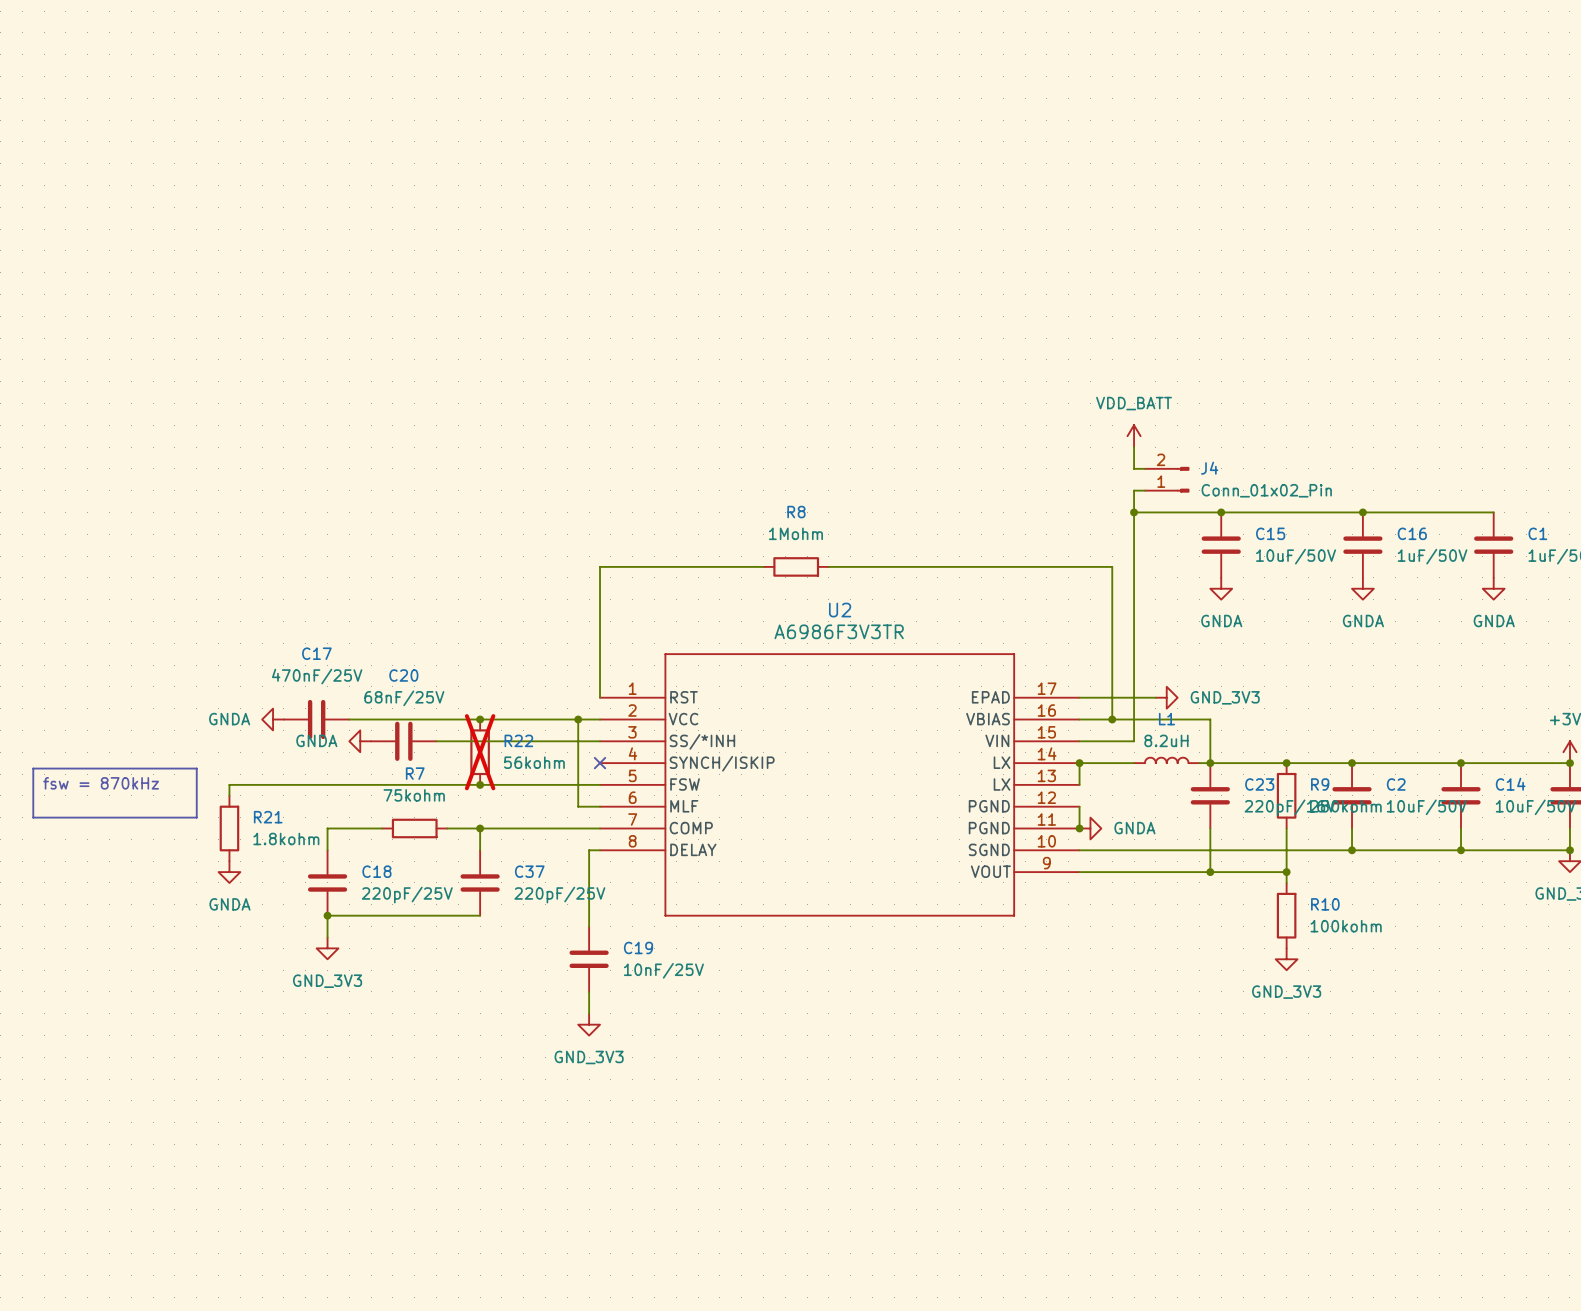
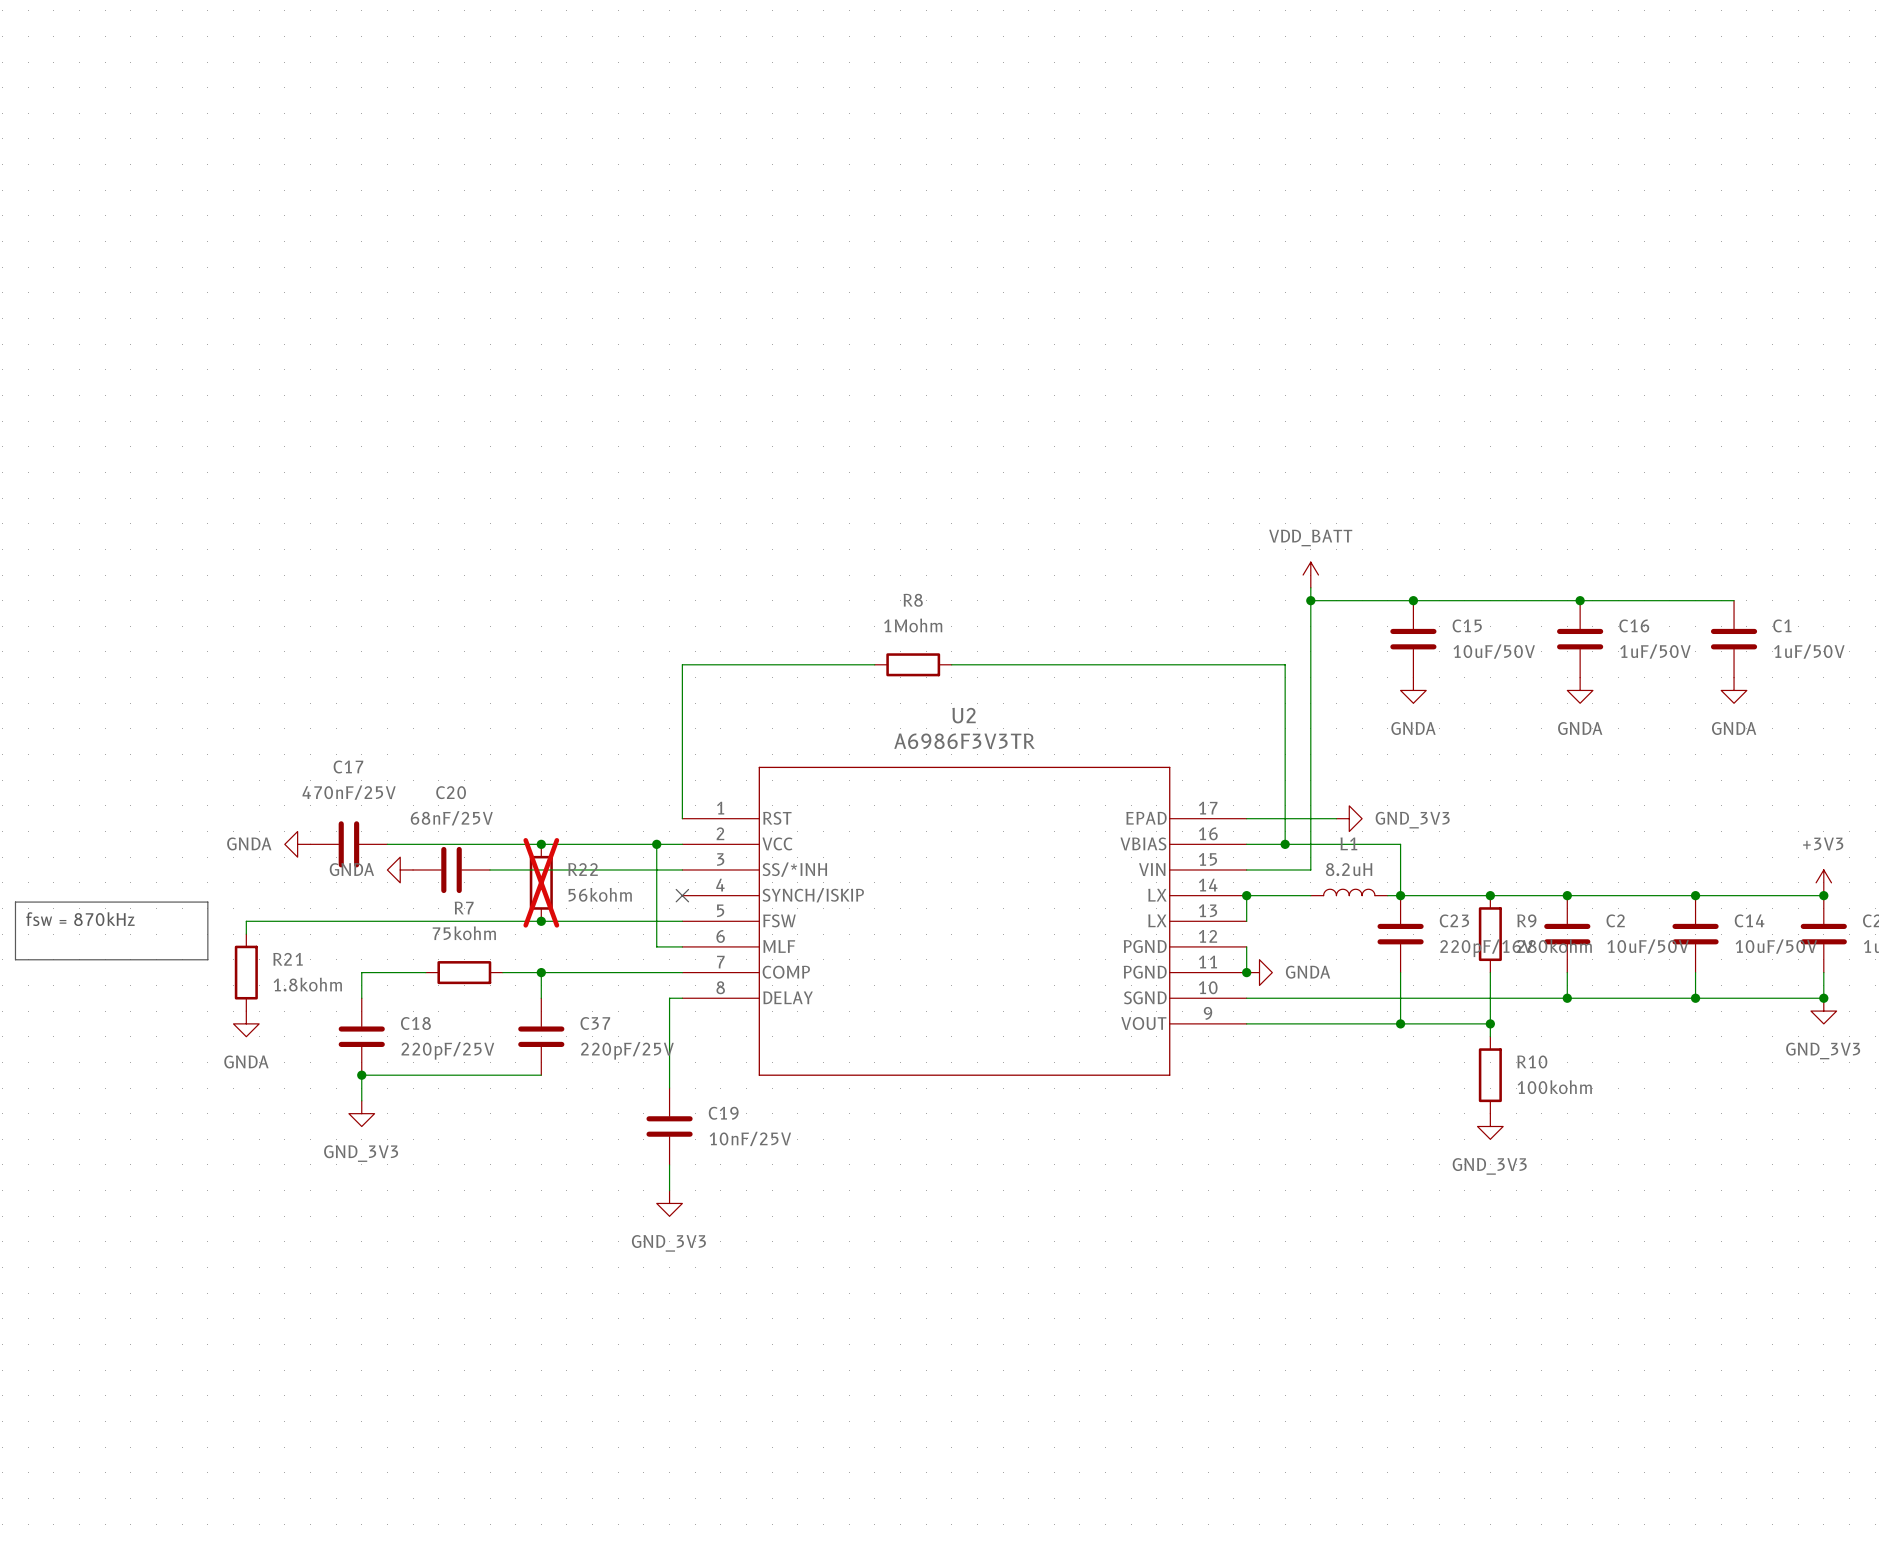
power symbol position: VDD_BATT (1134, 436) -> VDD_BATT (1310, 575)
wire: (1134, 447) (1134, 468) (1144, 468) -> none
J4: Conn_01x02_Pin (1167, 479) -> none

